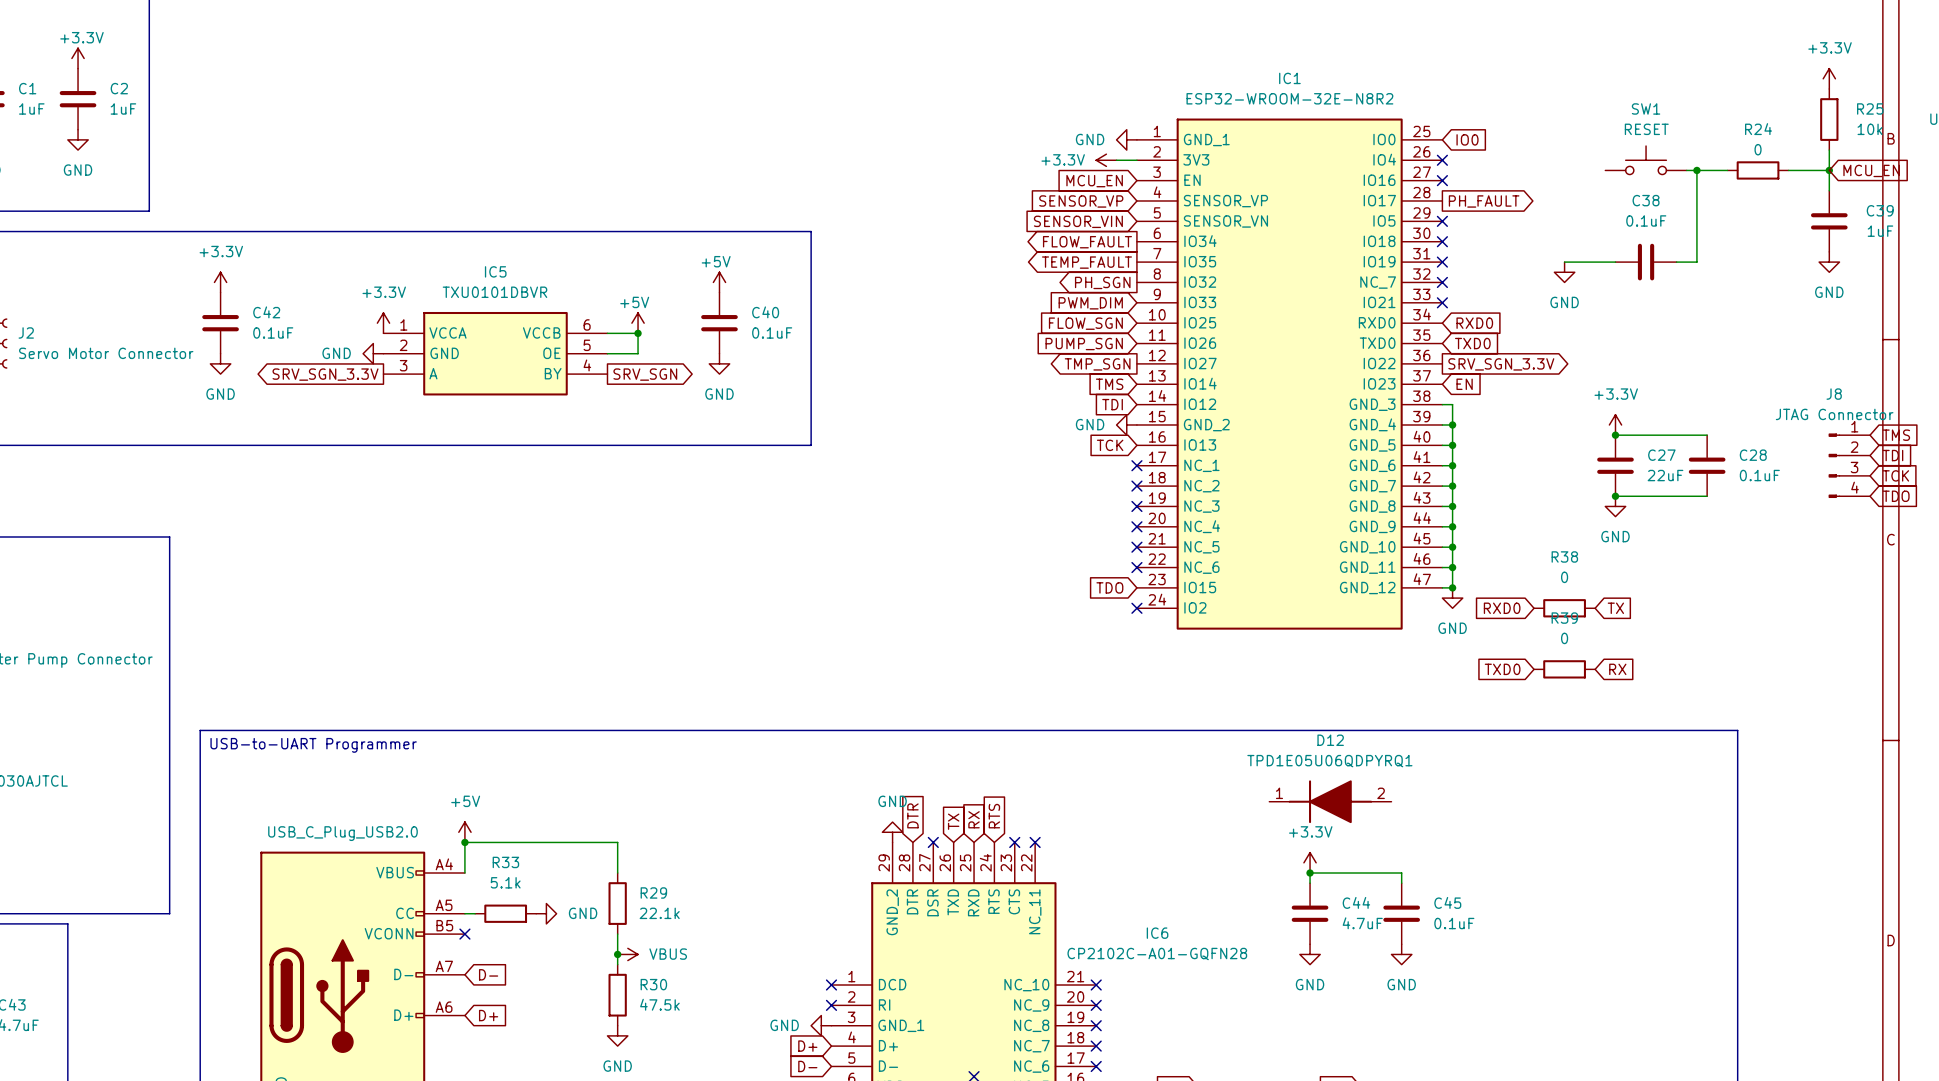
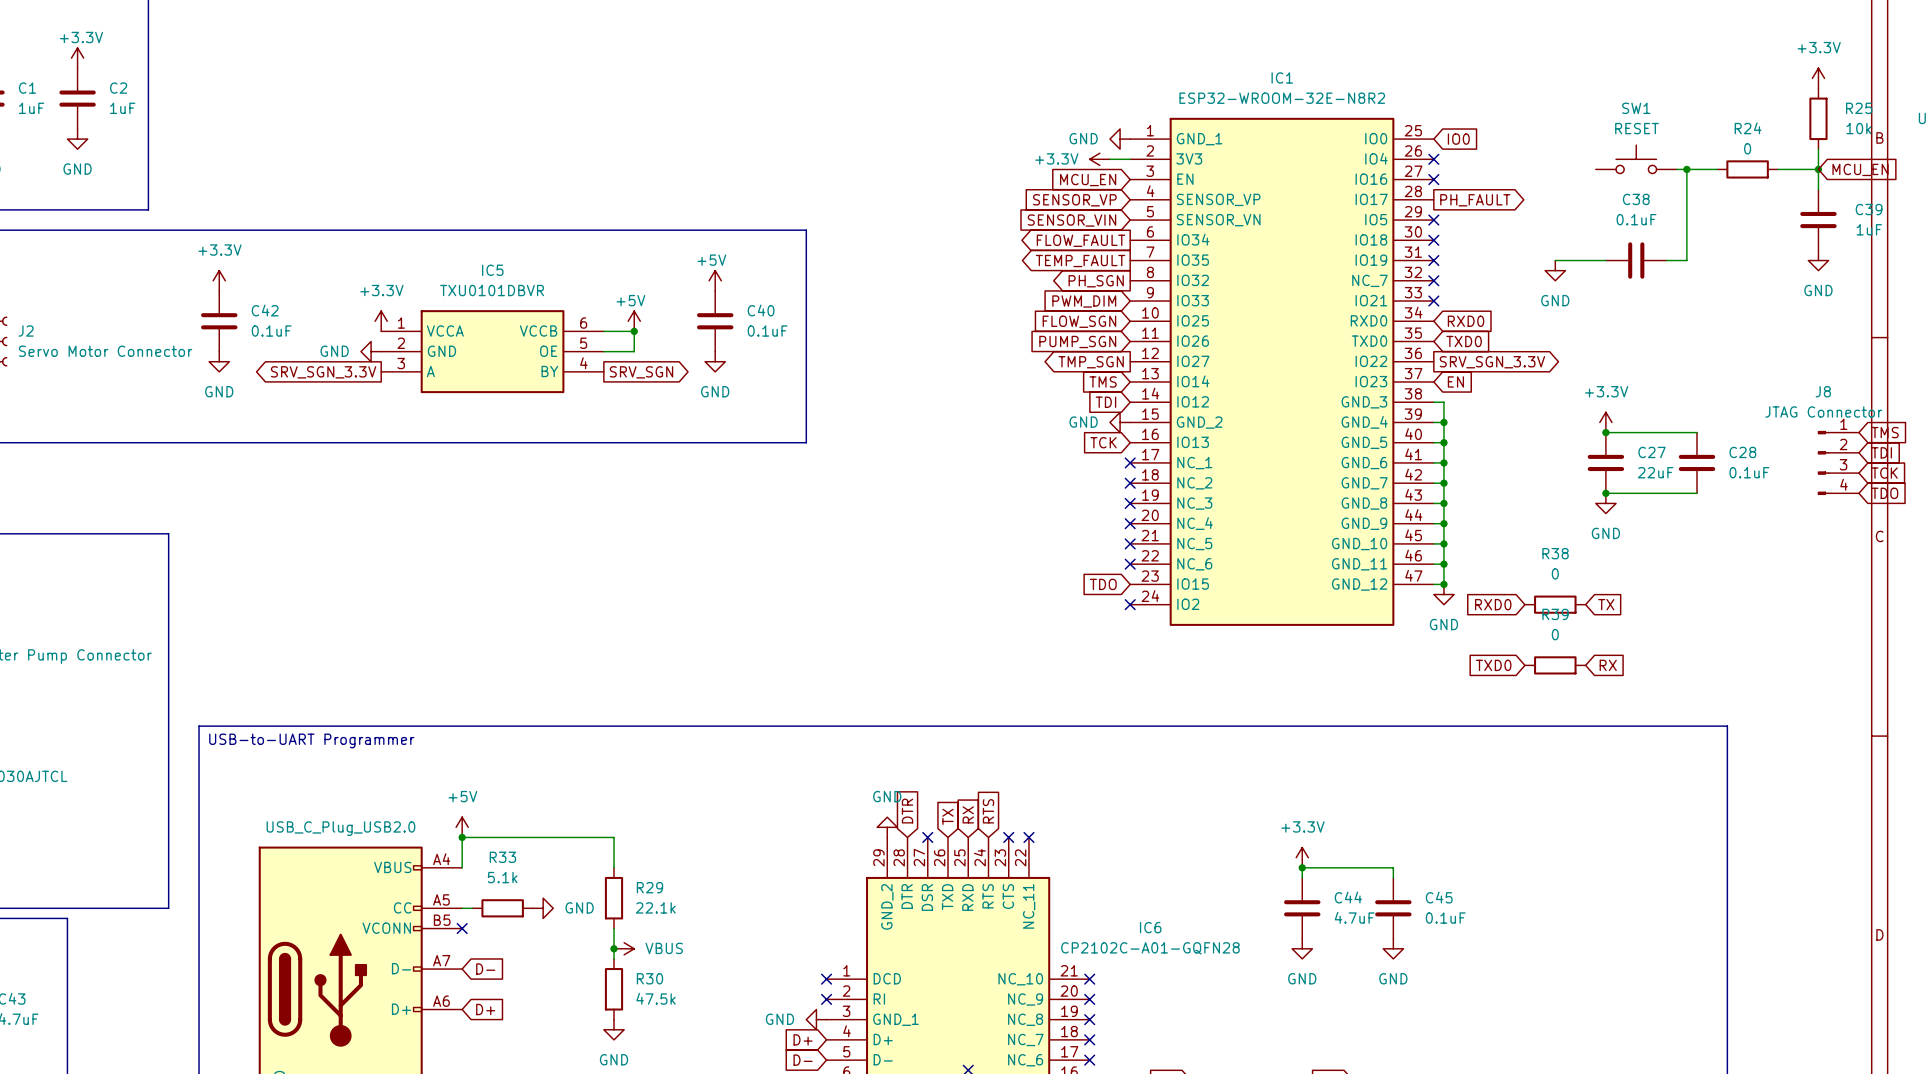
D12: TPD1E05U06QDPYRQ1 (1330, 801) -> none

